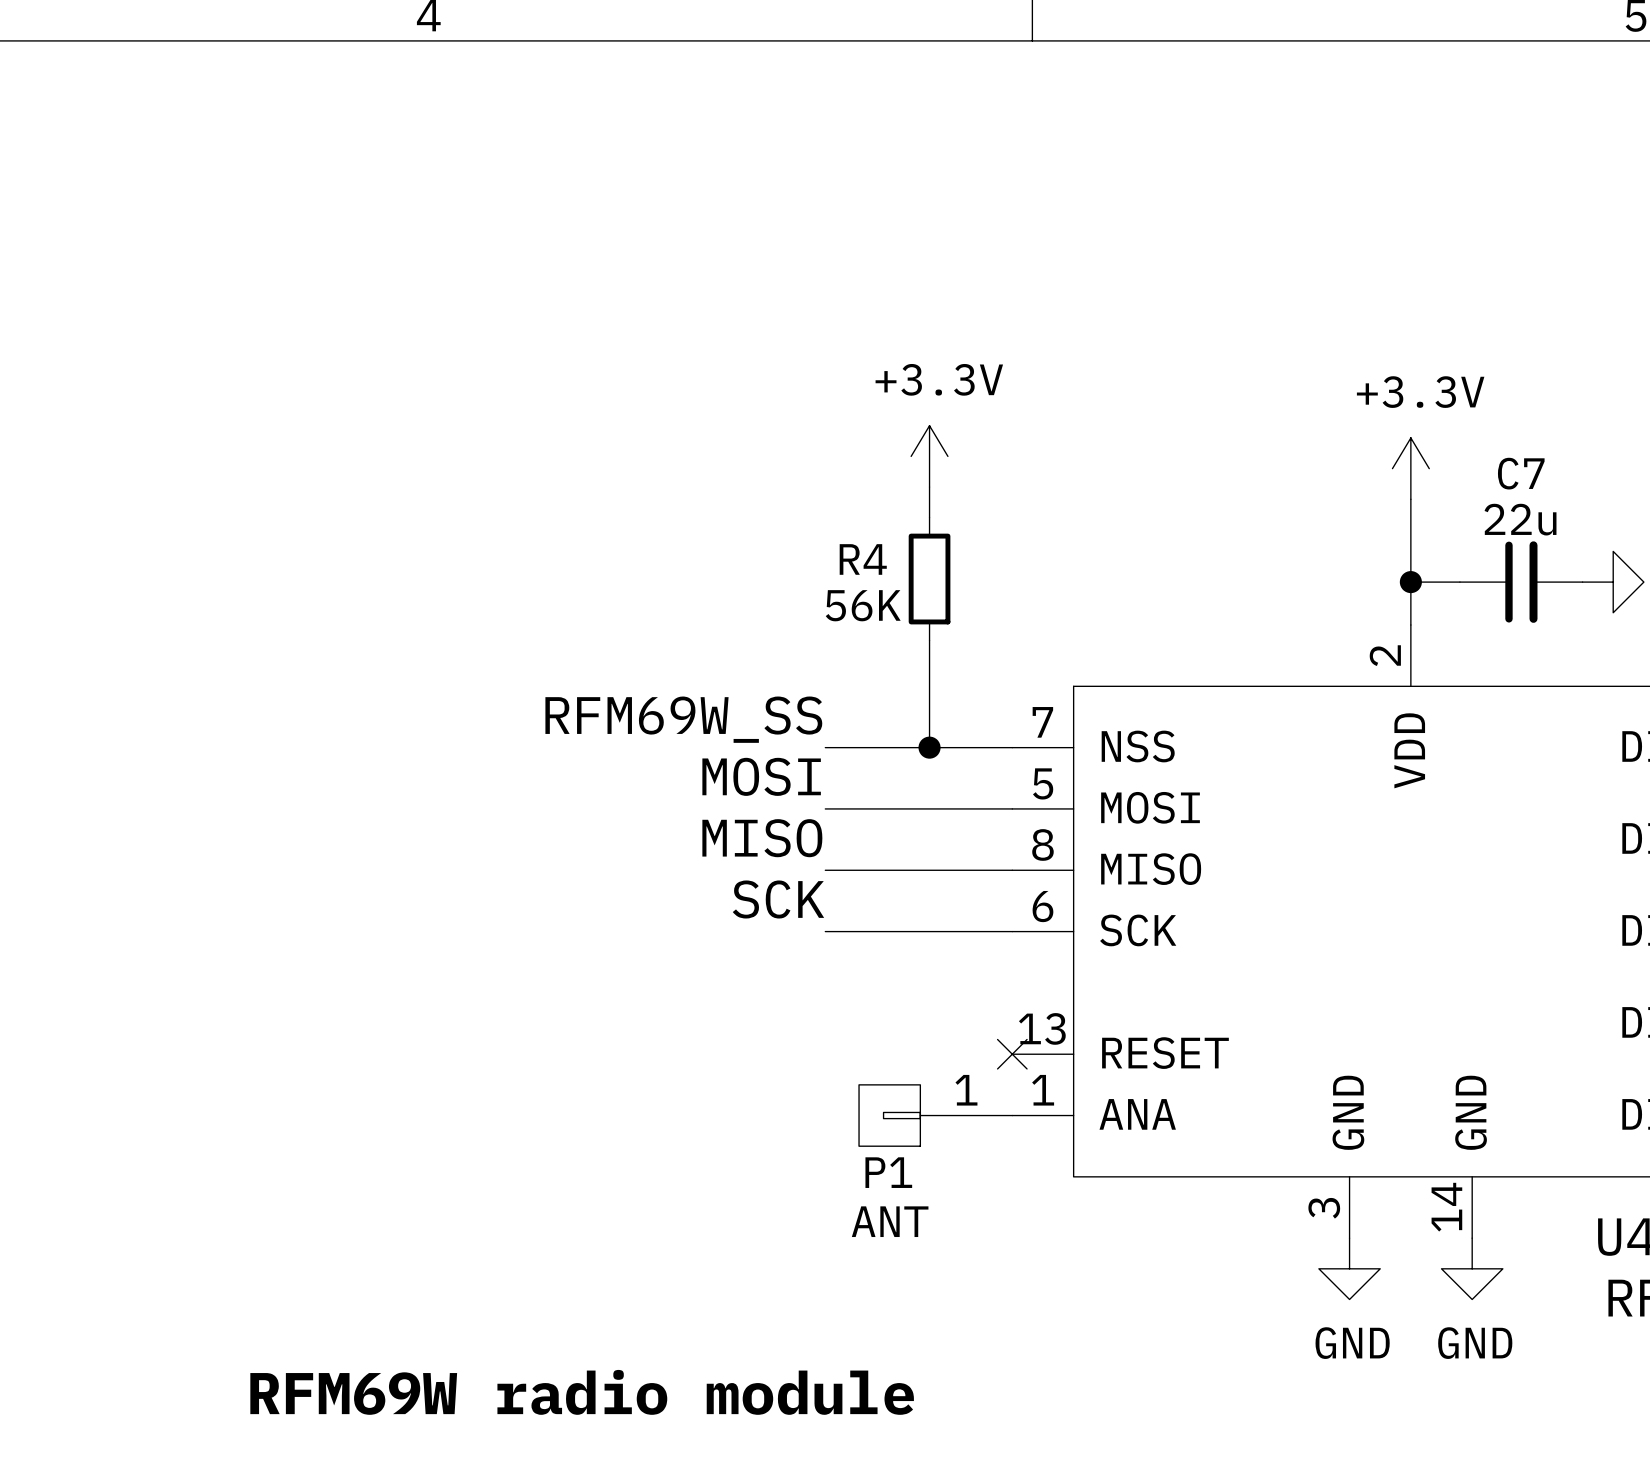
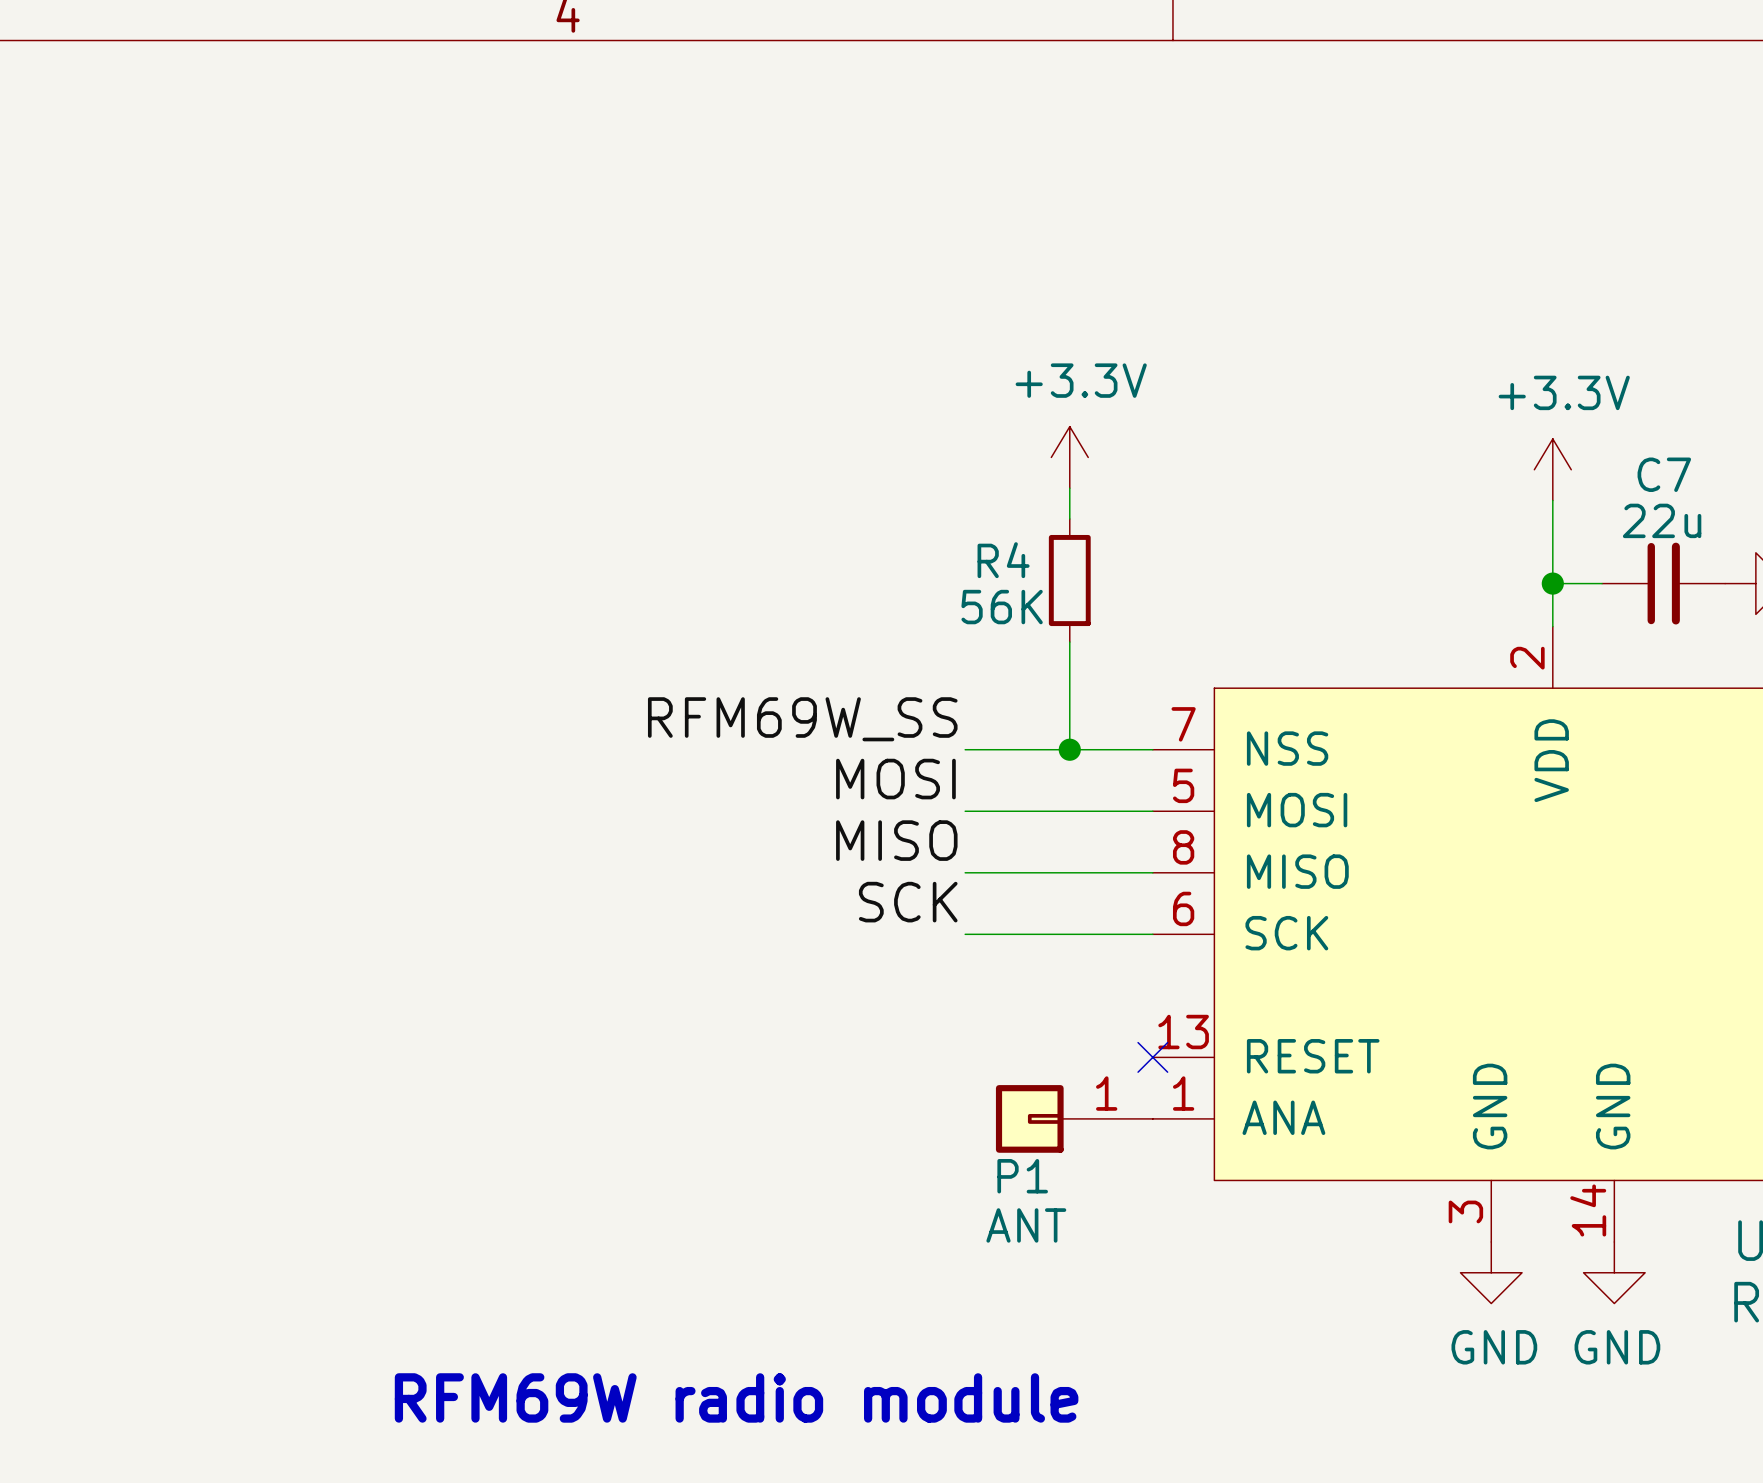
P1 symbol: [859, 1084, 1013, 1147] -> [995, 1085, 1153, 1153]

